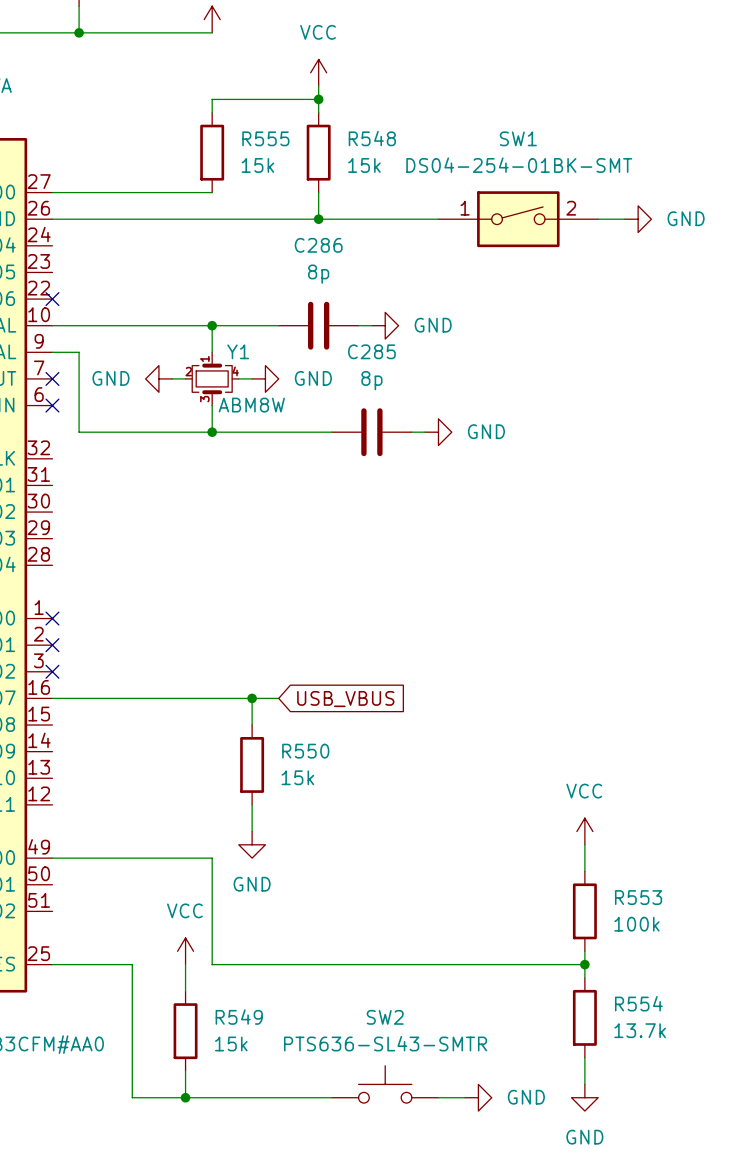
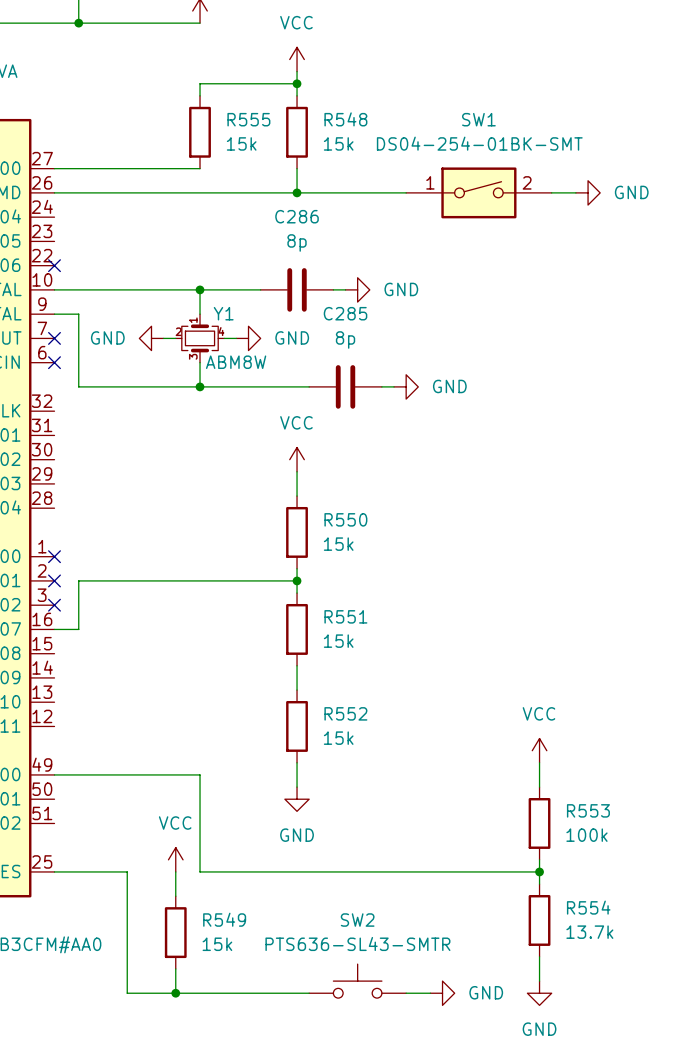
power symbol: none -> VCC (297, 459)
wire: none -> (297, 471) (297, 496)
wire: none -> (297, 568) (297, 593)
junction: none -> (297, 580)
wire: (79, 698) (278, 698) -> (78, 629) (78, 580) (297, 580)
wire: (252, 698) (252, 725) -> (297, 665) (297, 690)
junction: (252, 698) -> none
R551: none -> 15k (297, 629)
global label: USB_VBUS (345, 699) -> none
R550 position: (252, 764) -> (297, 532)
wire: (252, 804) (252, 831) -> (297, 762) (297, 787)
R552: none -> 15k (297, 726)
power symbol position: GND (252, 844) -> GND (297, 799)

